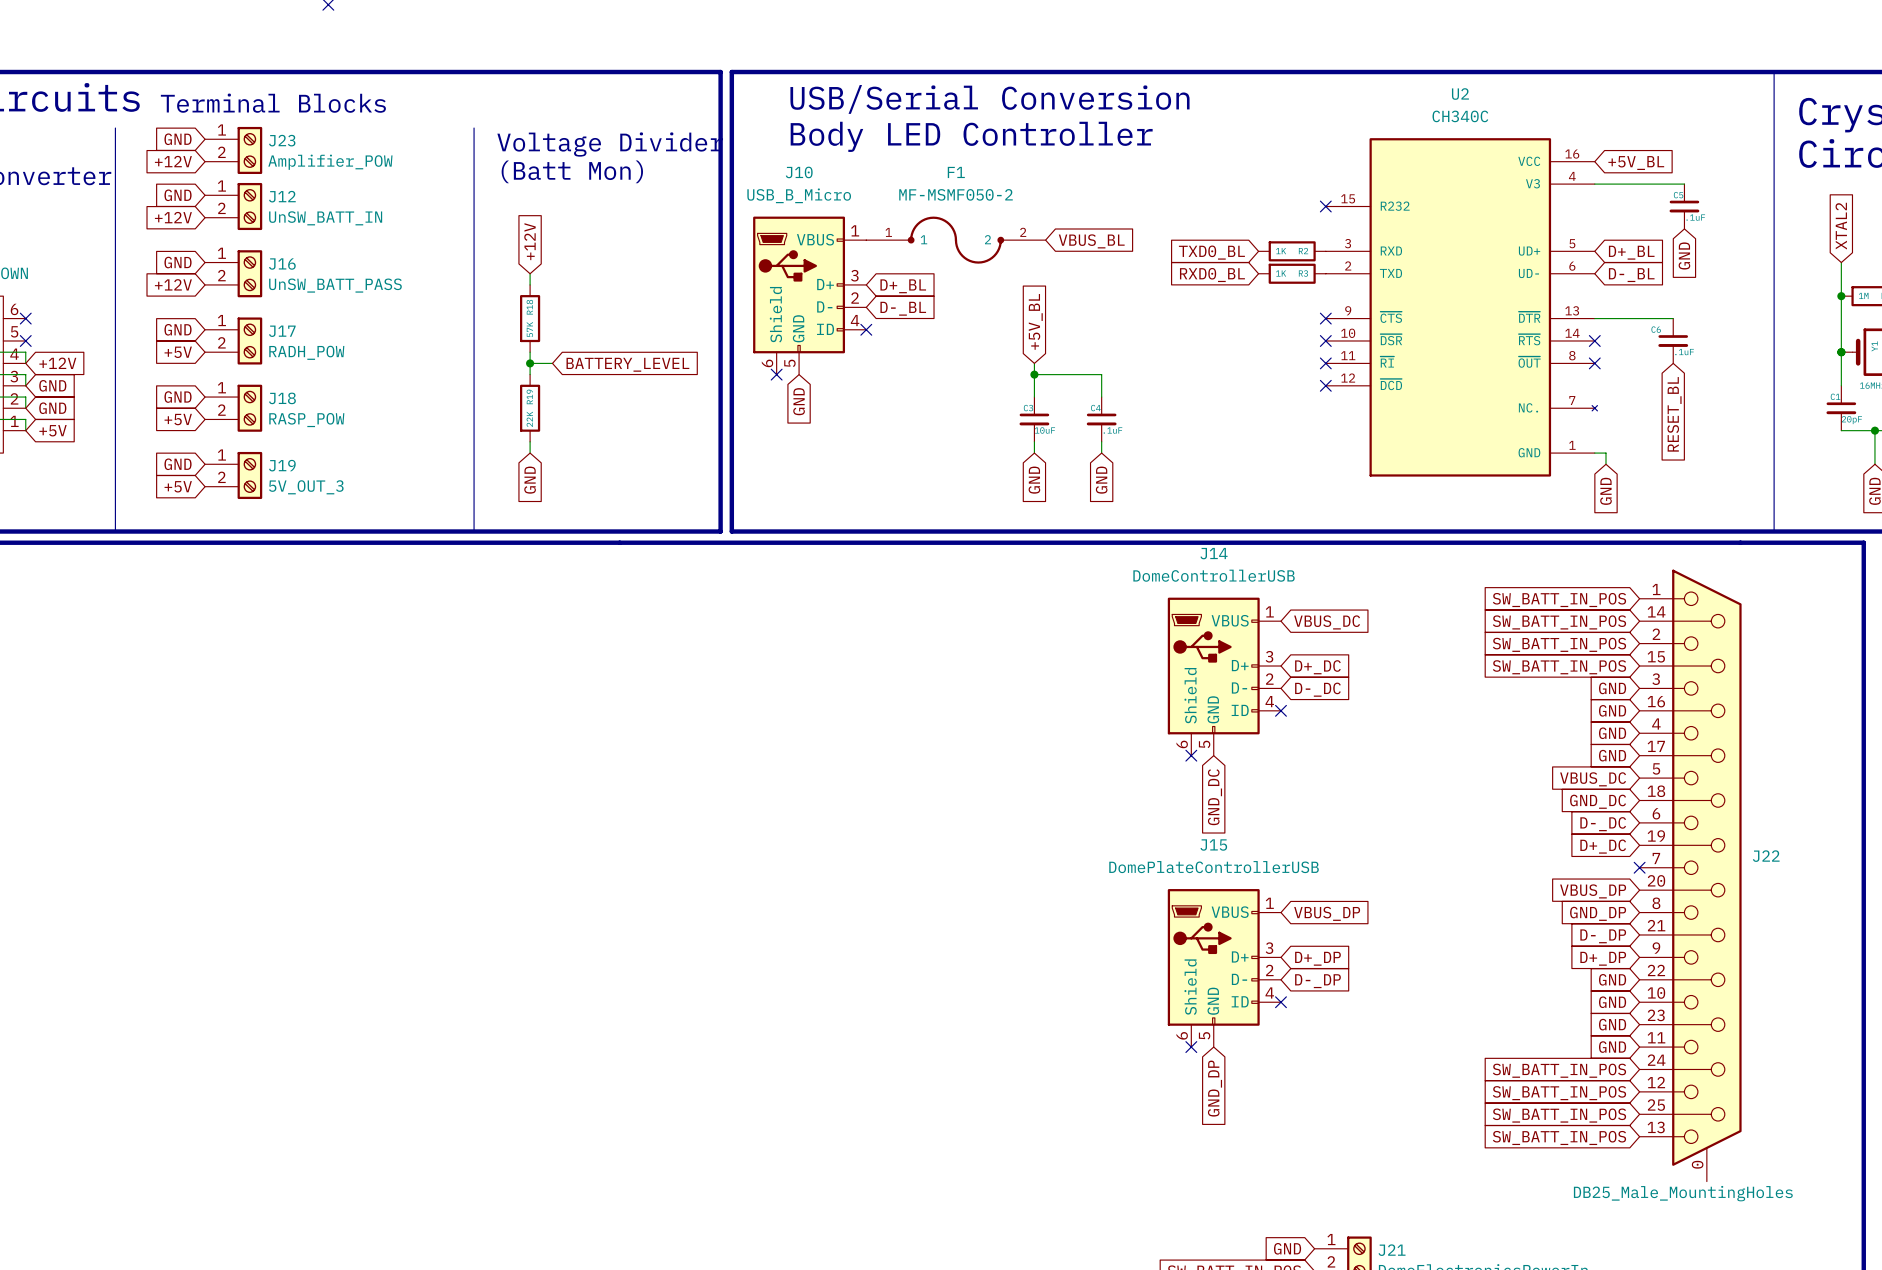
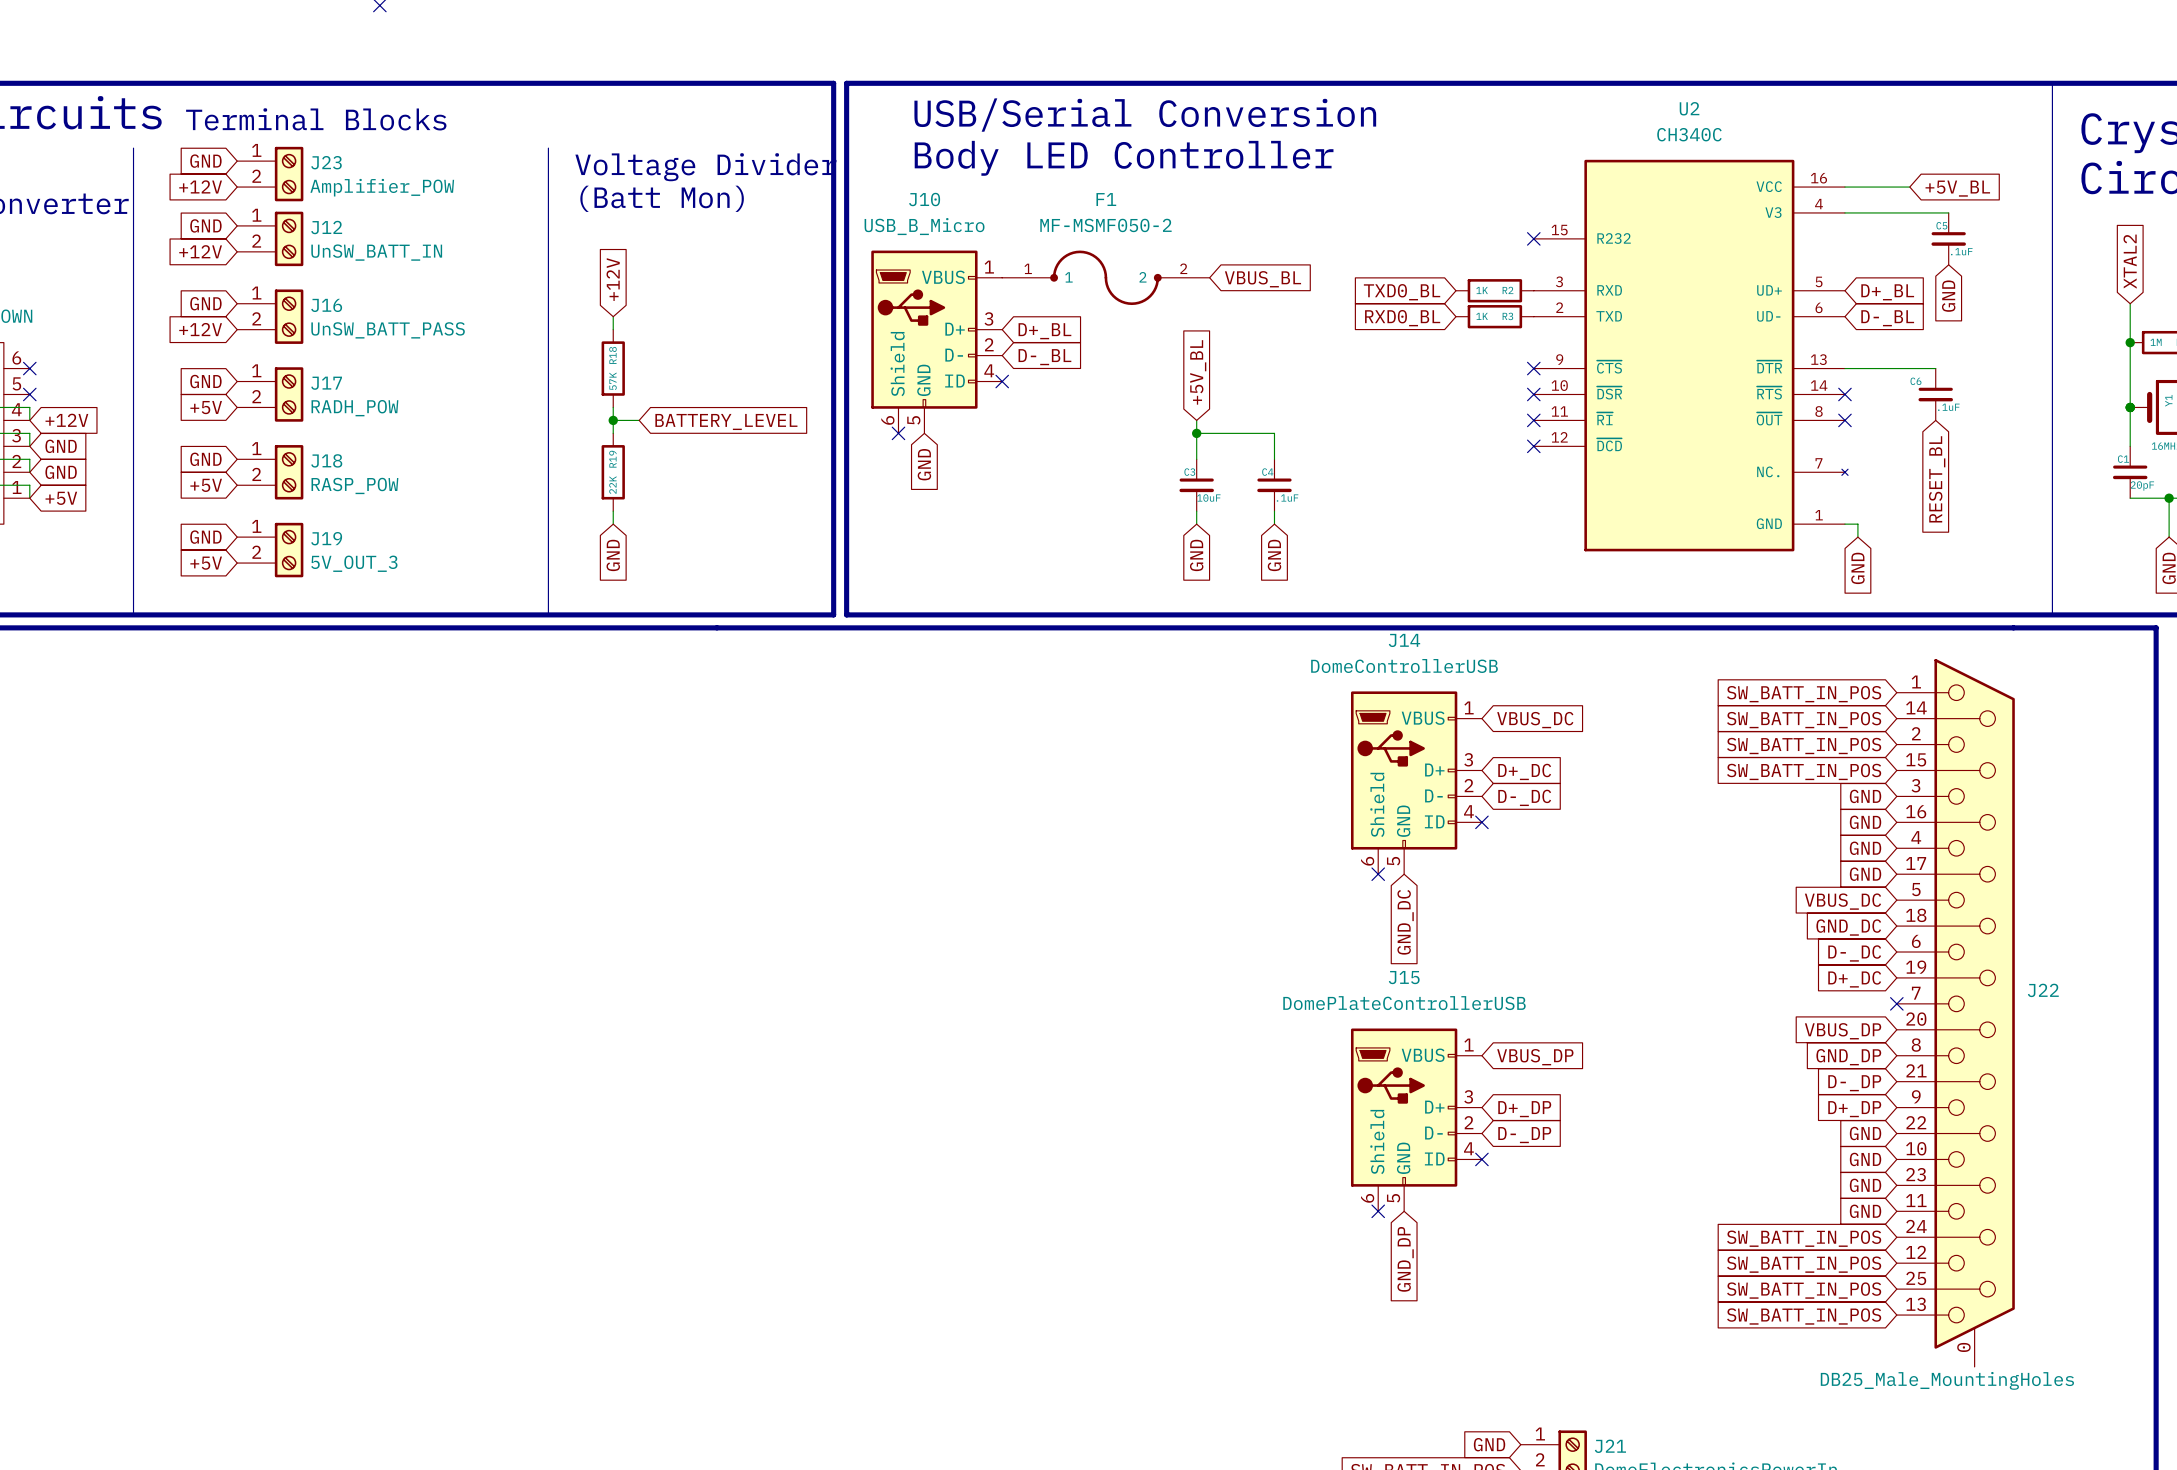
wire: none -> (1844, 187) (1909, 187)
global label position: +5V_BL (1636, 163) -> +5V_BL (1957, 188)

